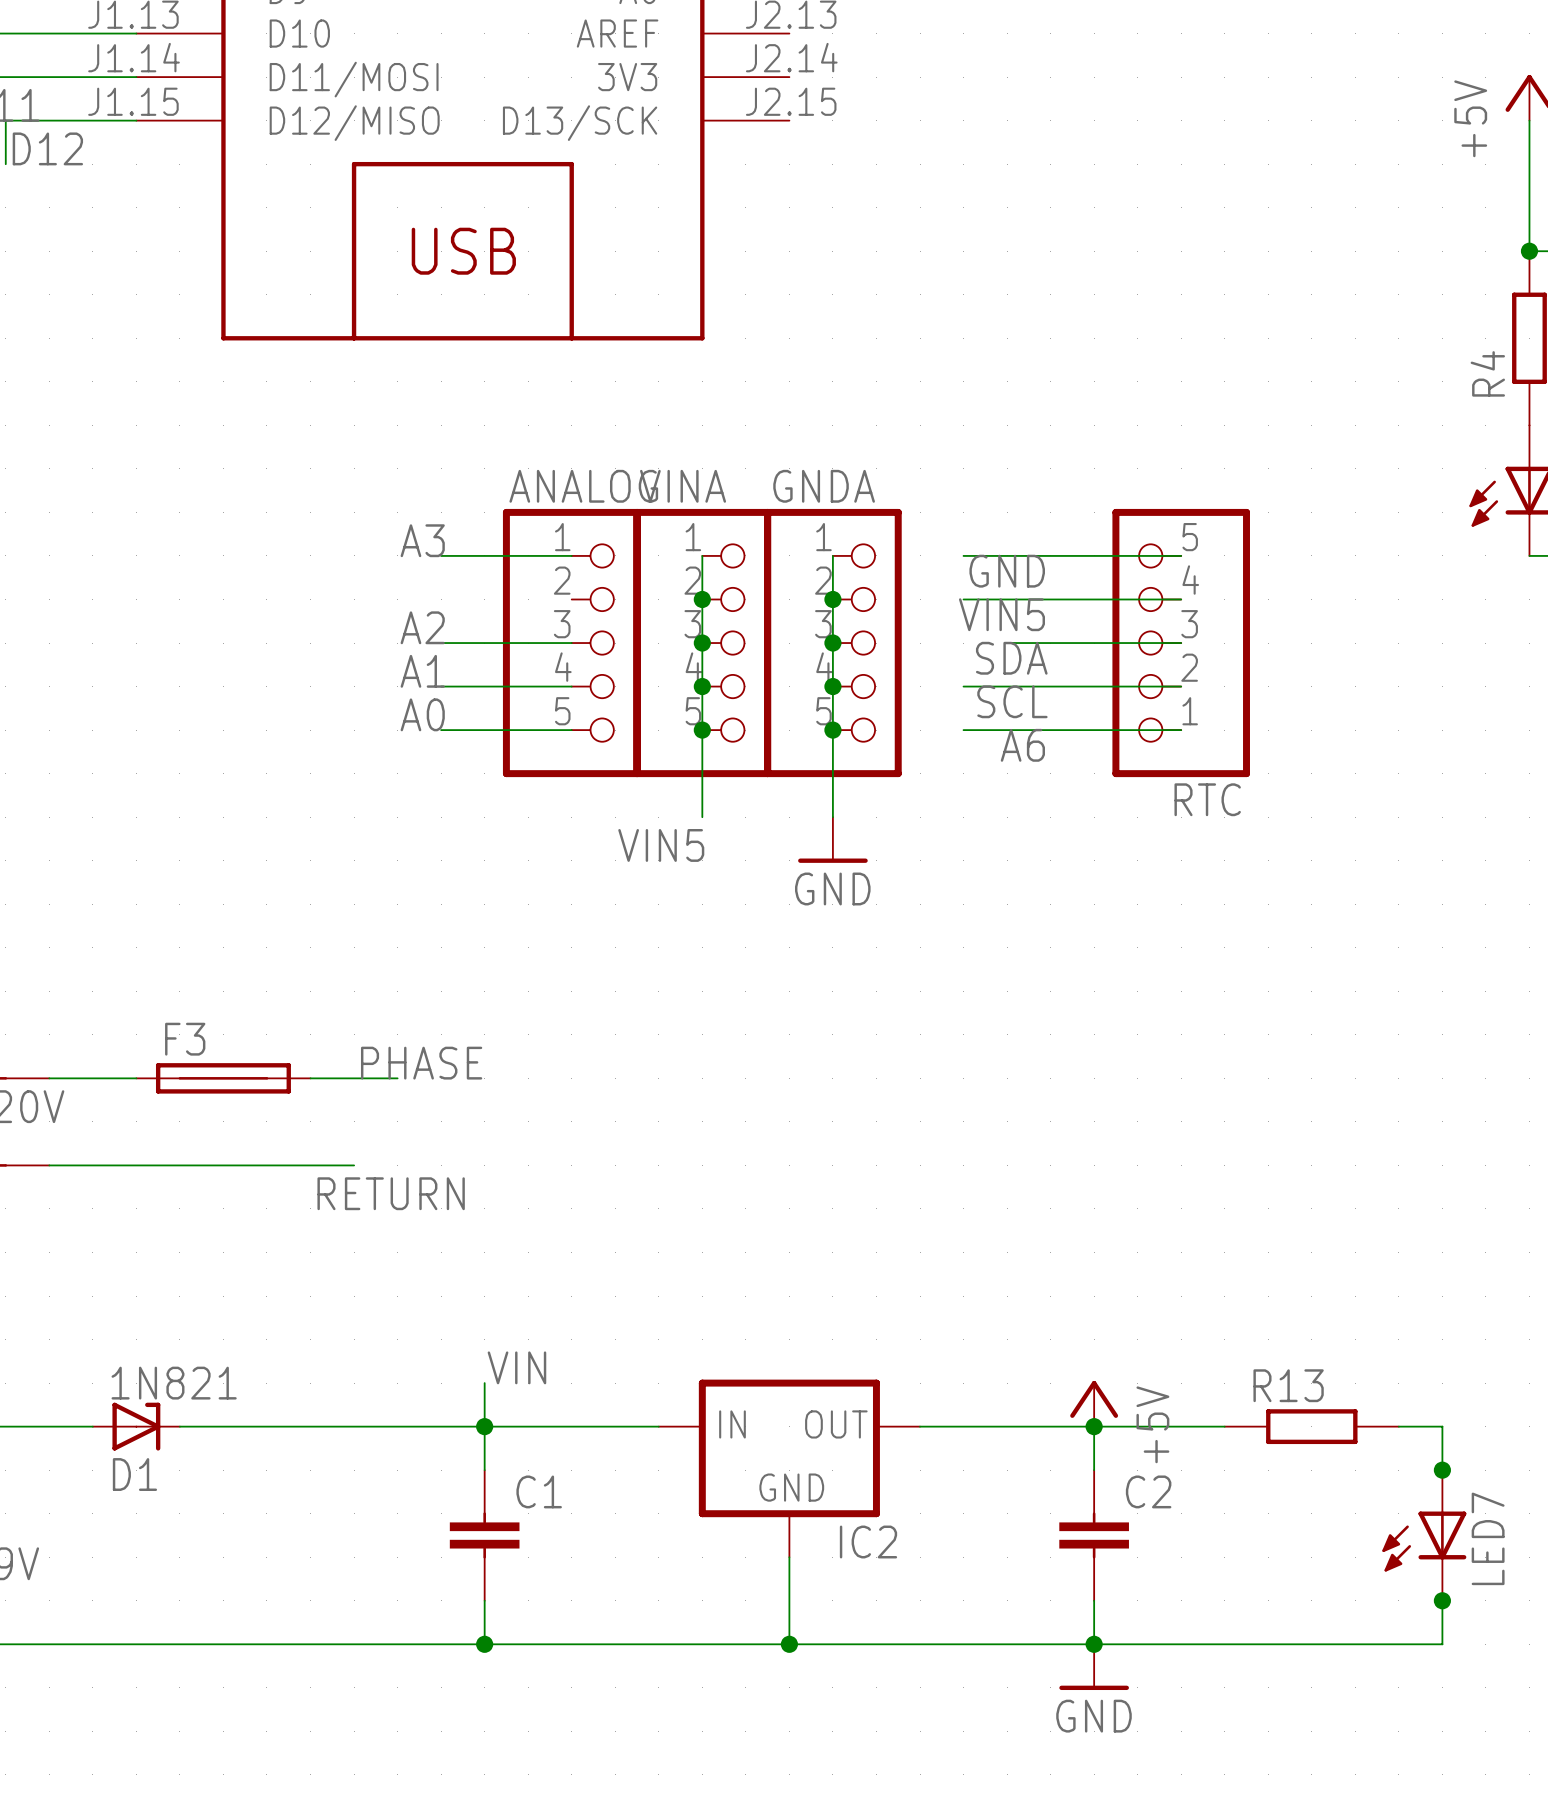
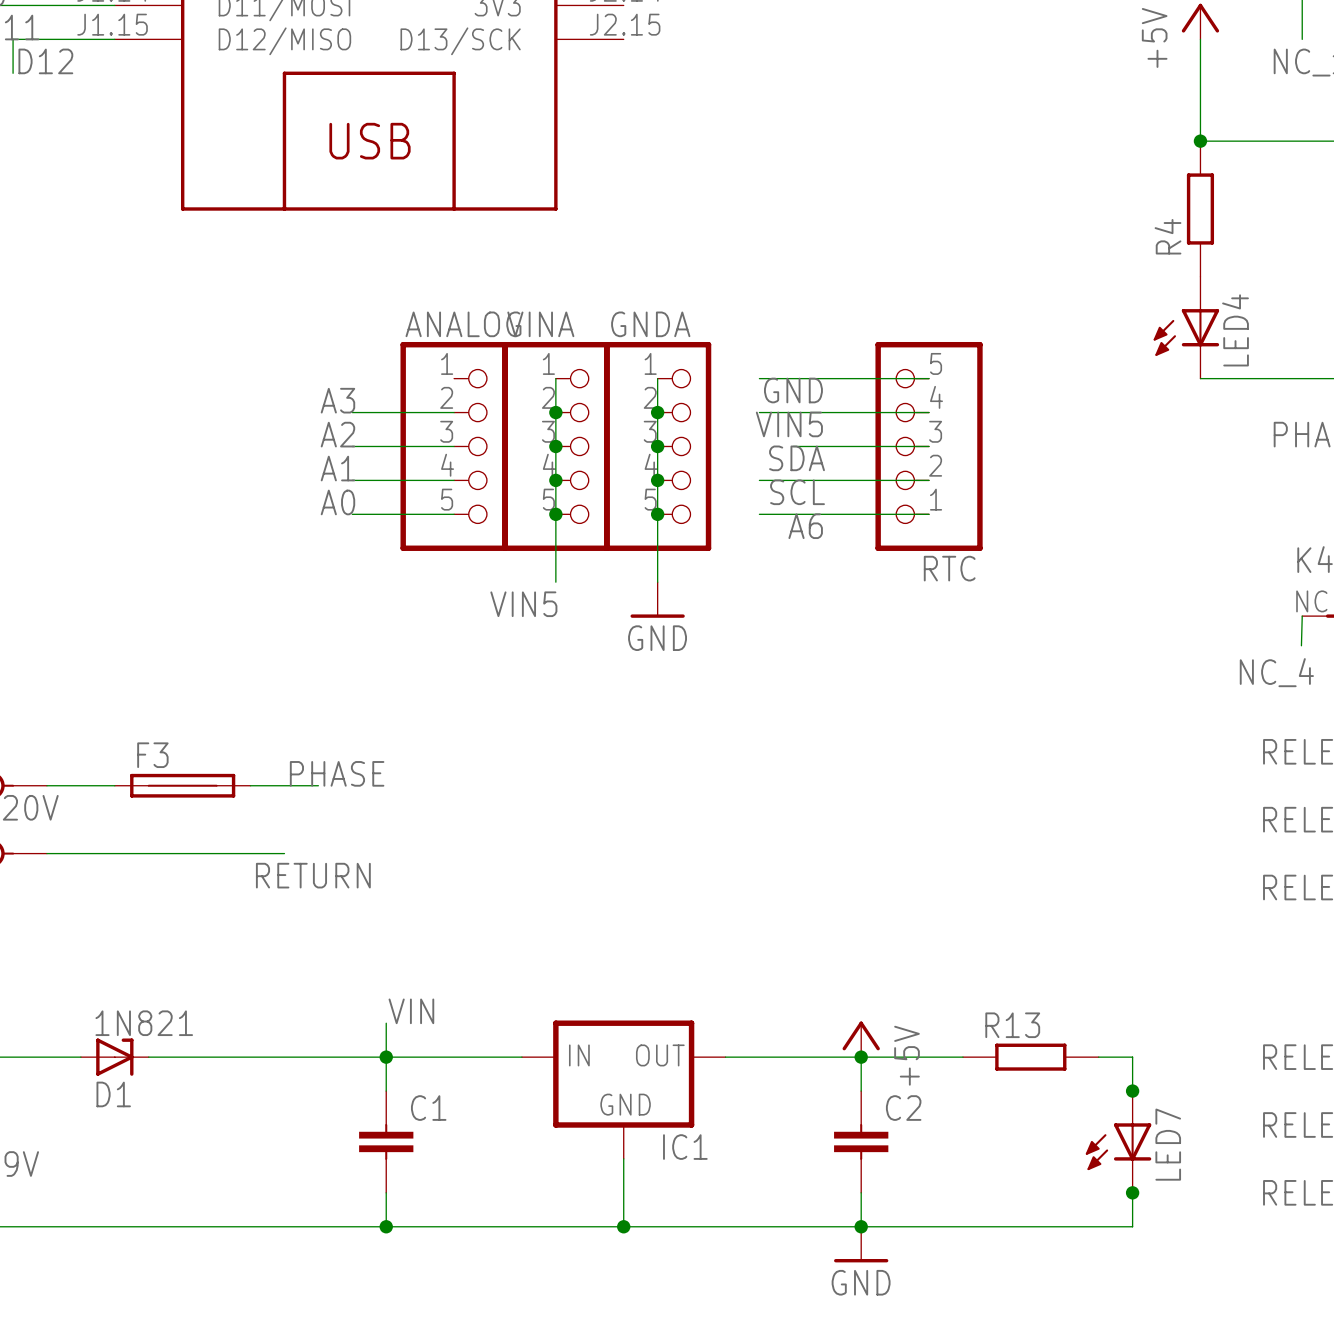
label position: A3 (422, 540) -> A3 (337, 400)
wire: (441, 555) (571, 555) -> (352, 412) (454, 412)
IC2 name: IC2 (868, 1542) -> IC1 (685, 1147)

